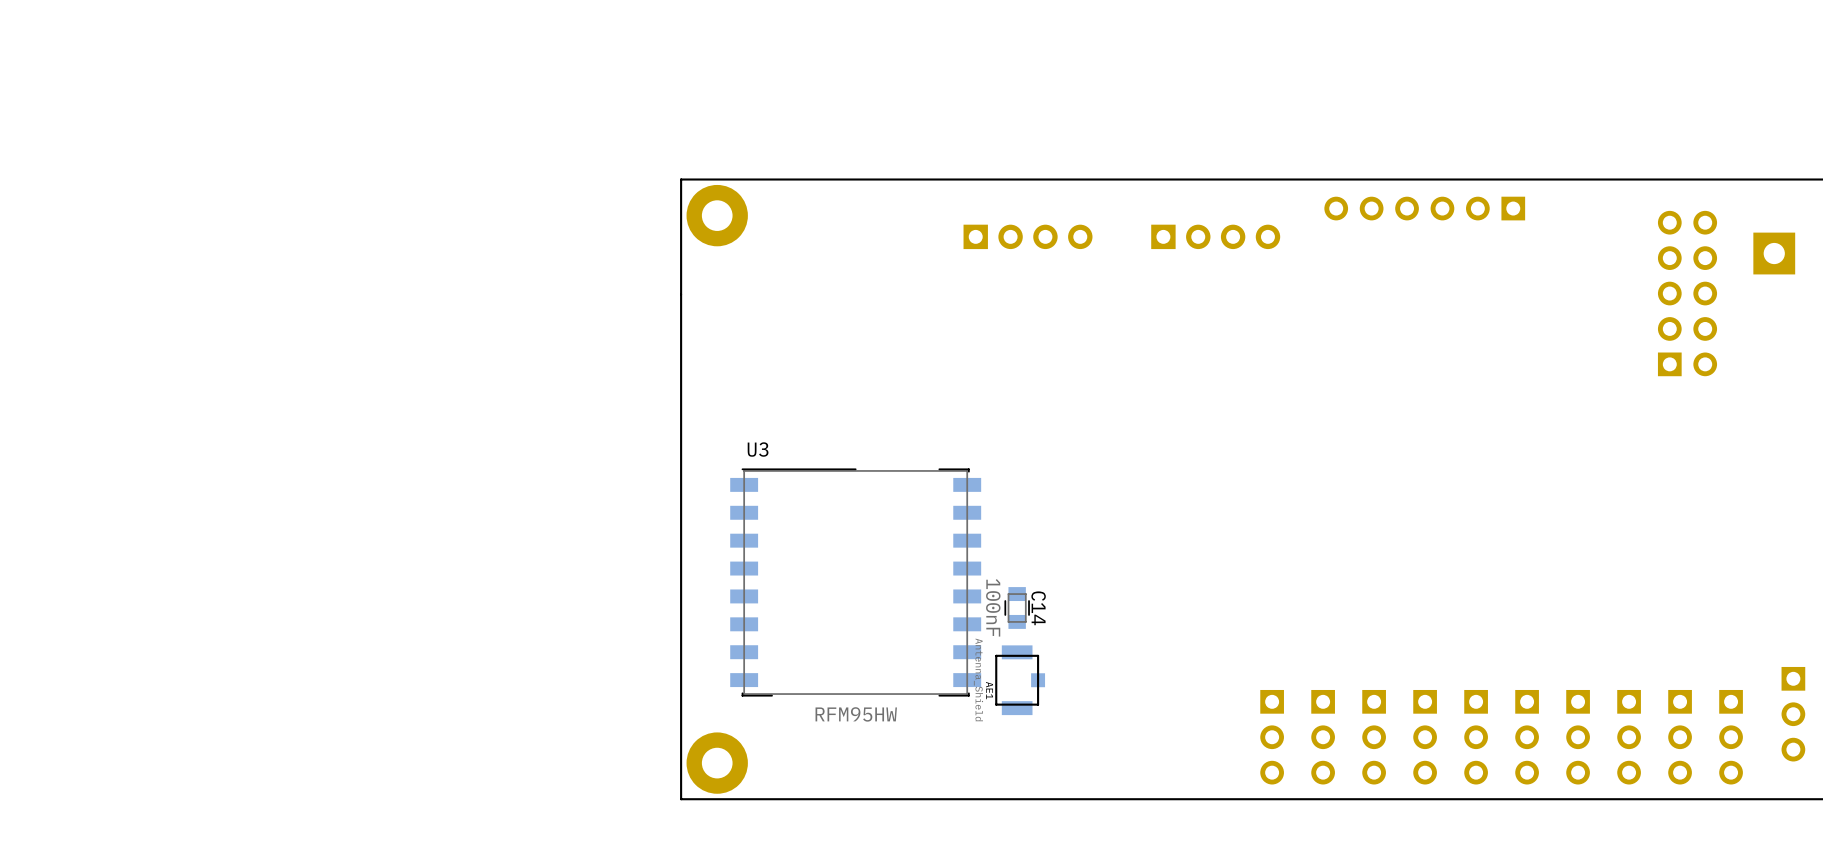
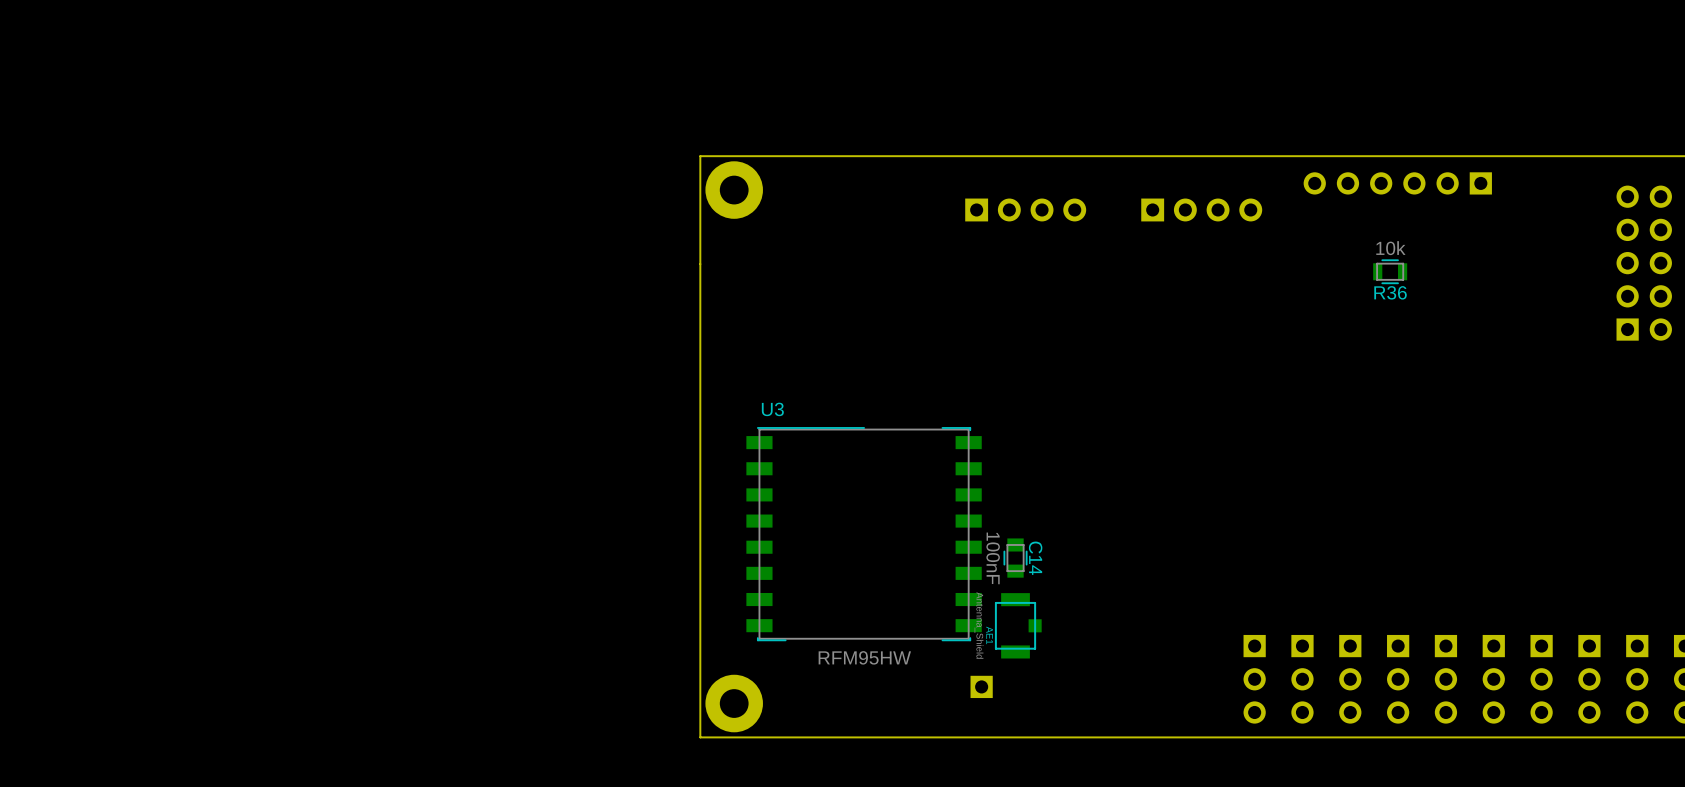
R36: none -> 10k (1390, 271)
part: none -> (981, 686)

